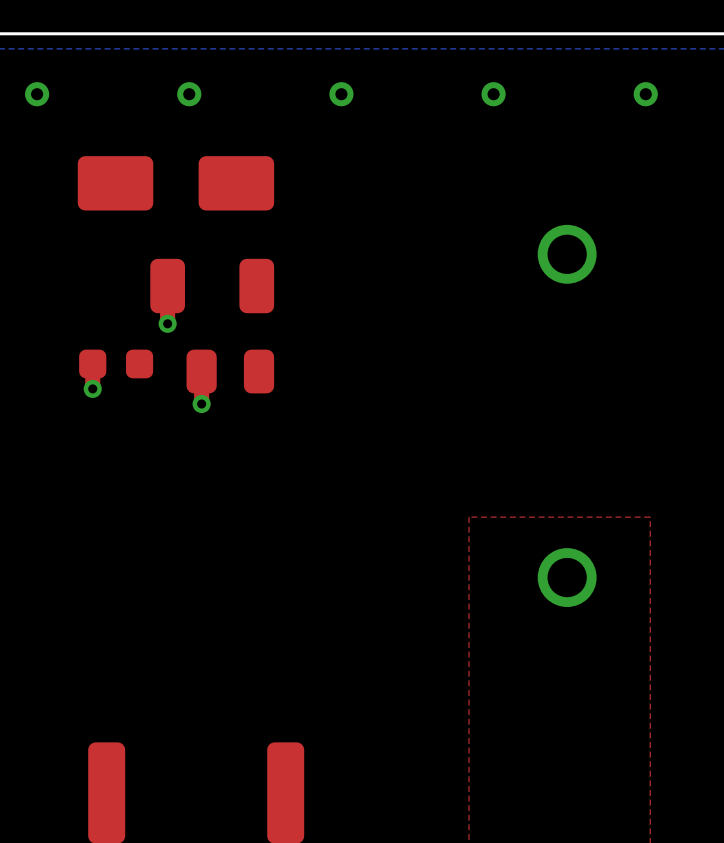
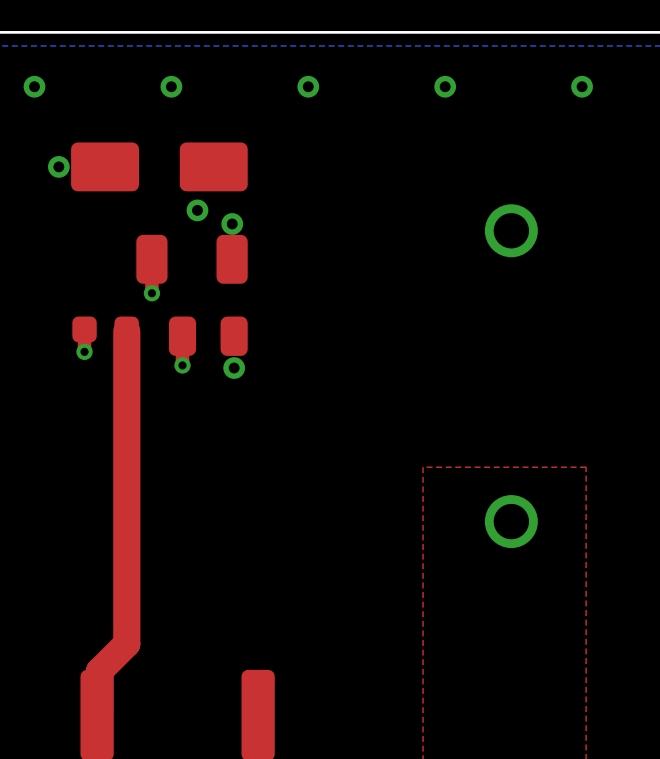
via: none -> (58, 166)
via: none -> (197, 210)
via: none -> (232, 223)
top track: none -> (126, 331) (126, 643) (99, 671) (99, 711)
via: none -> (234, 368)

